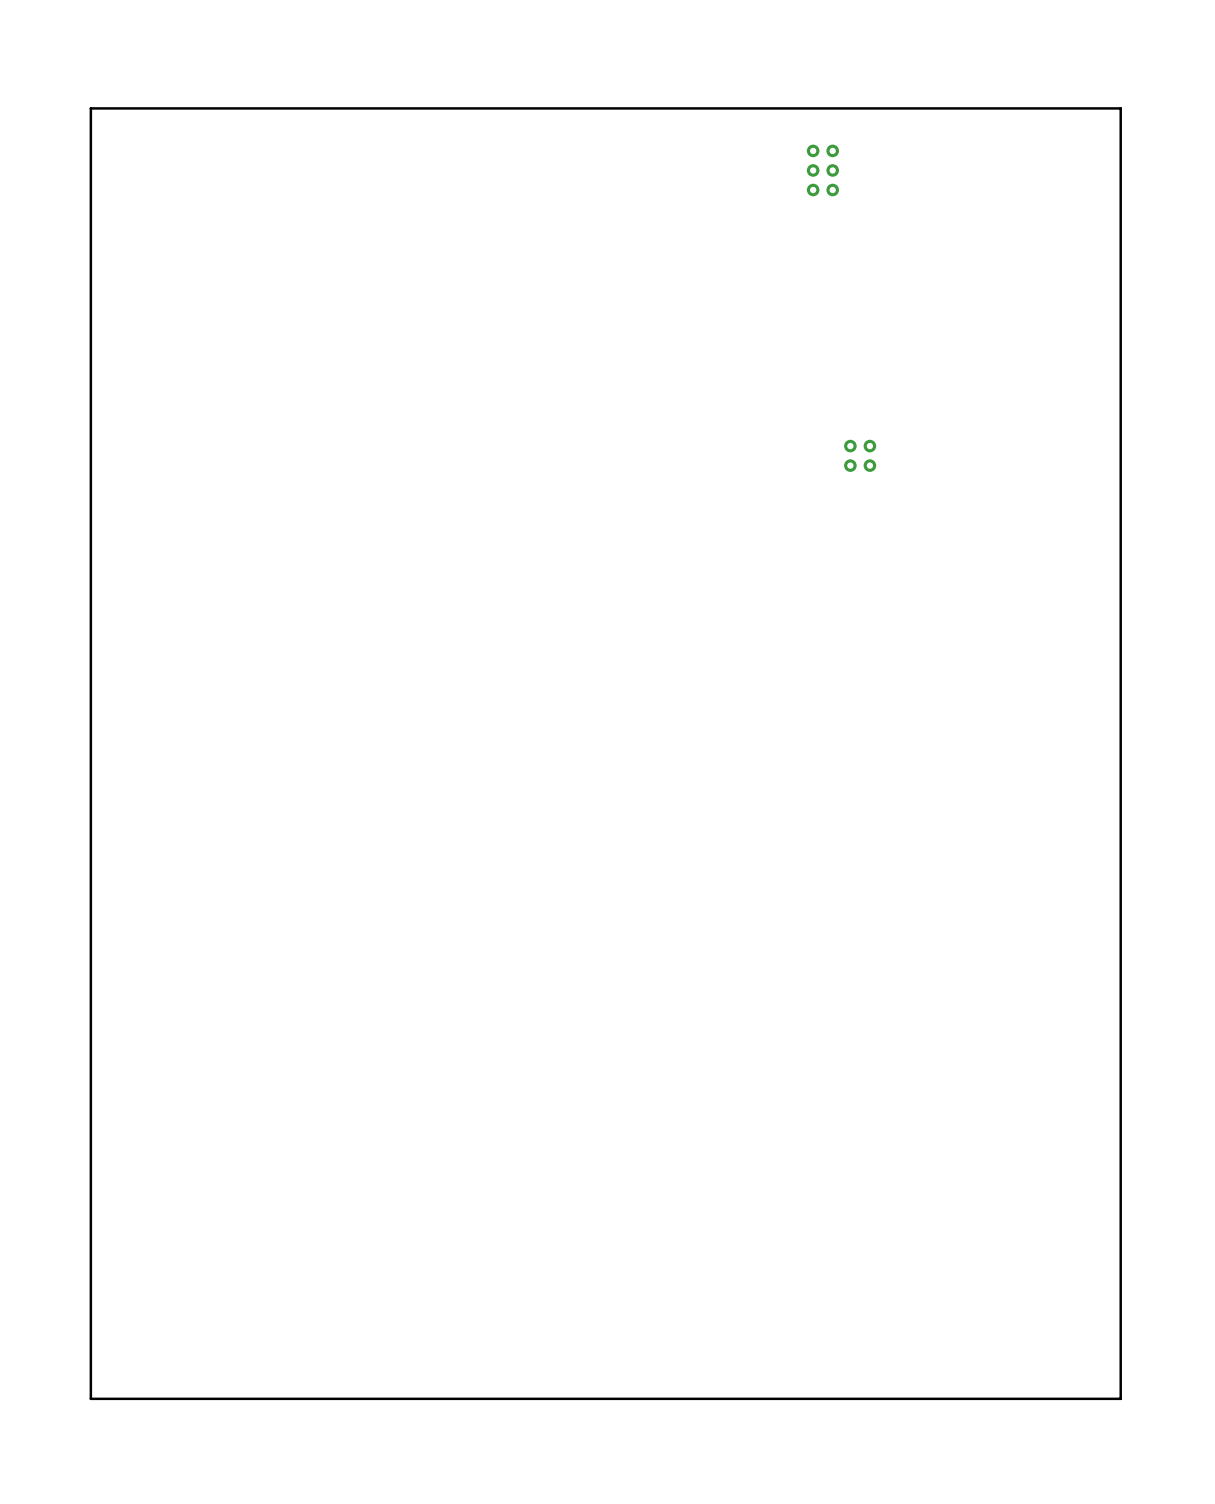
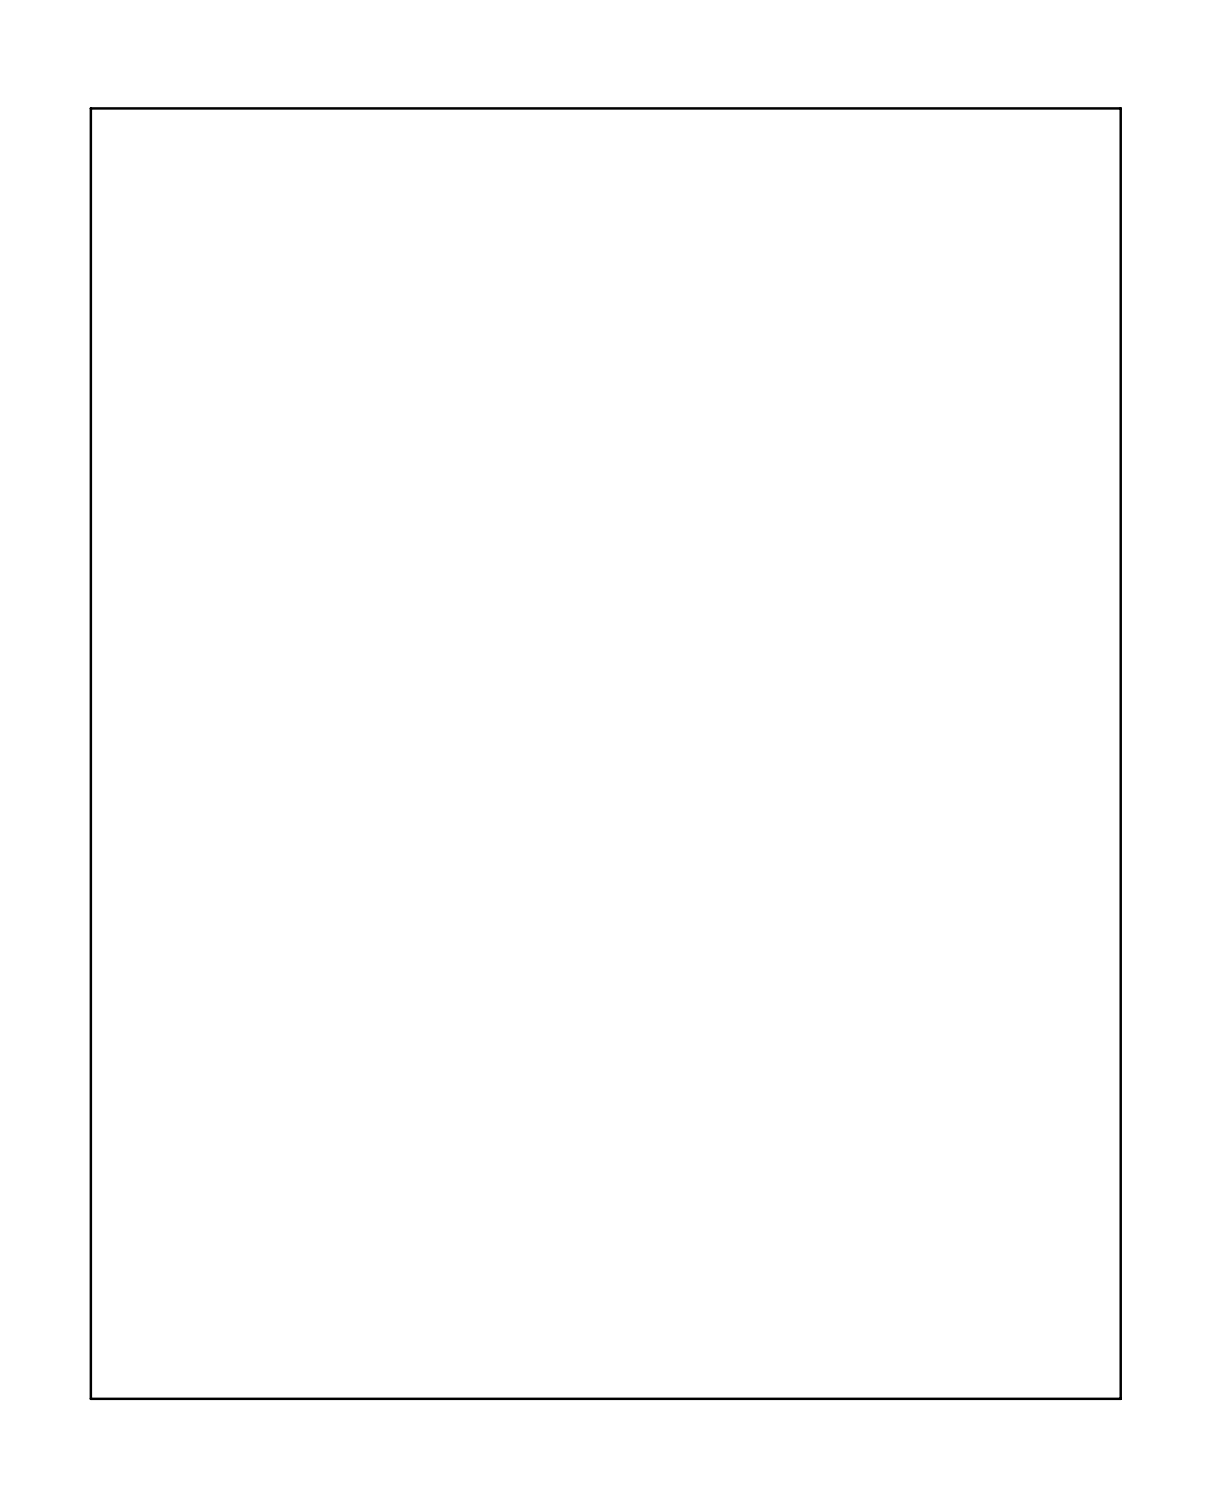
part: (822, 170) -> none
part: (860, 455) -> none

